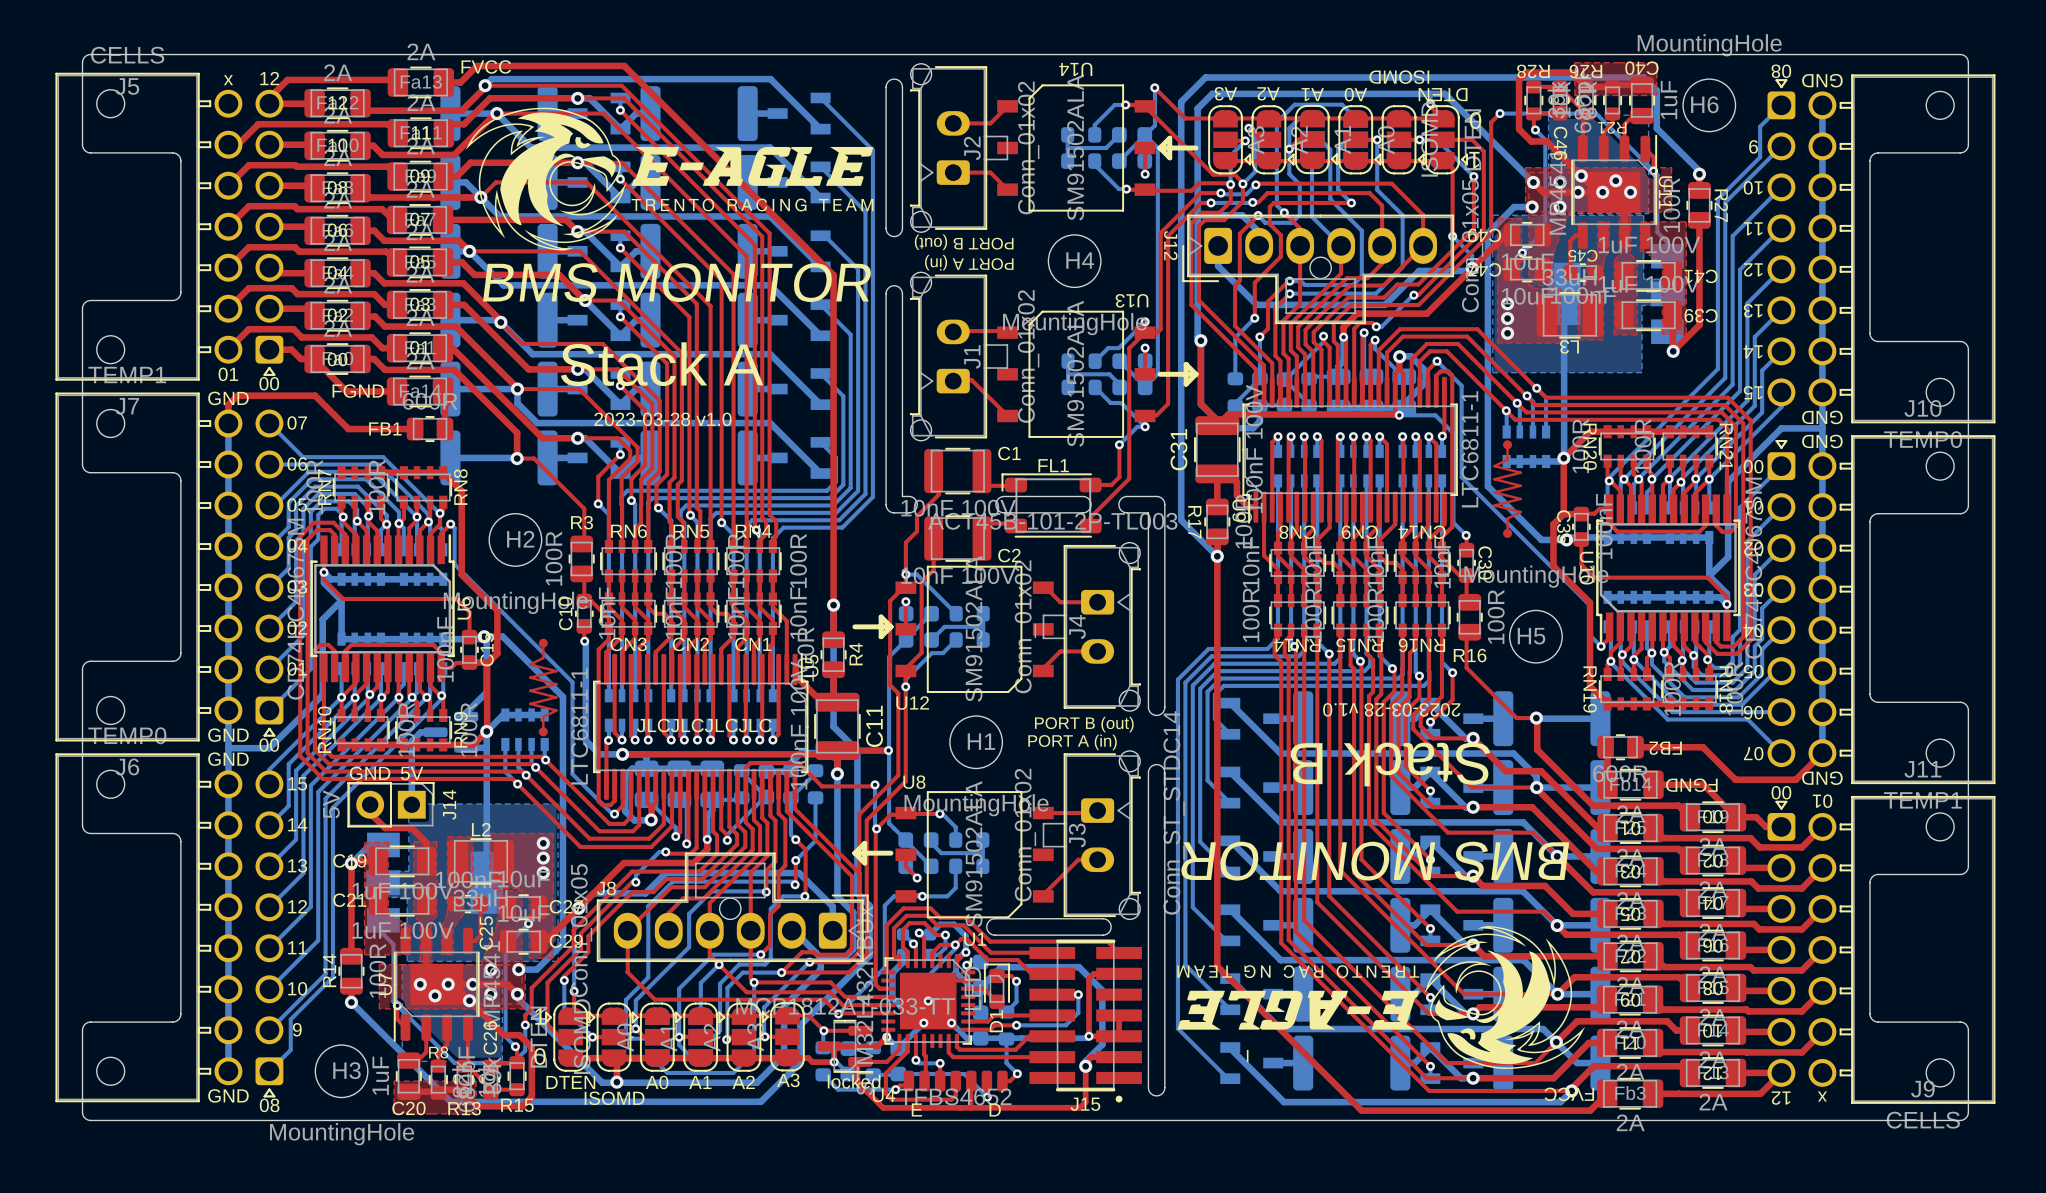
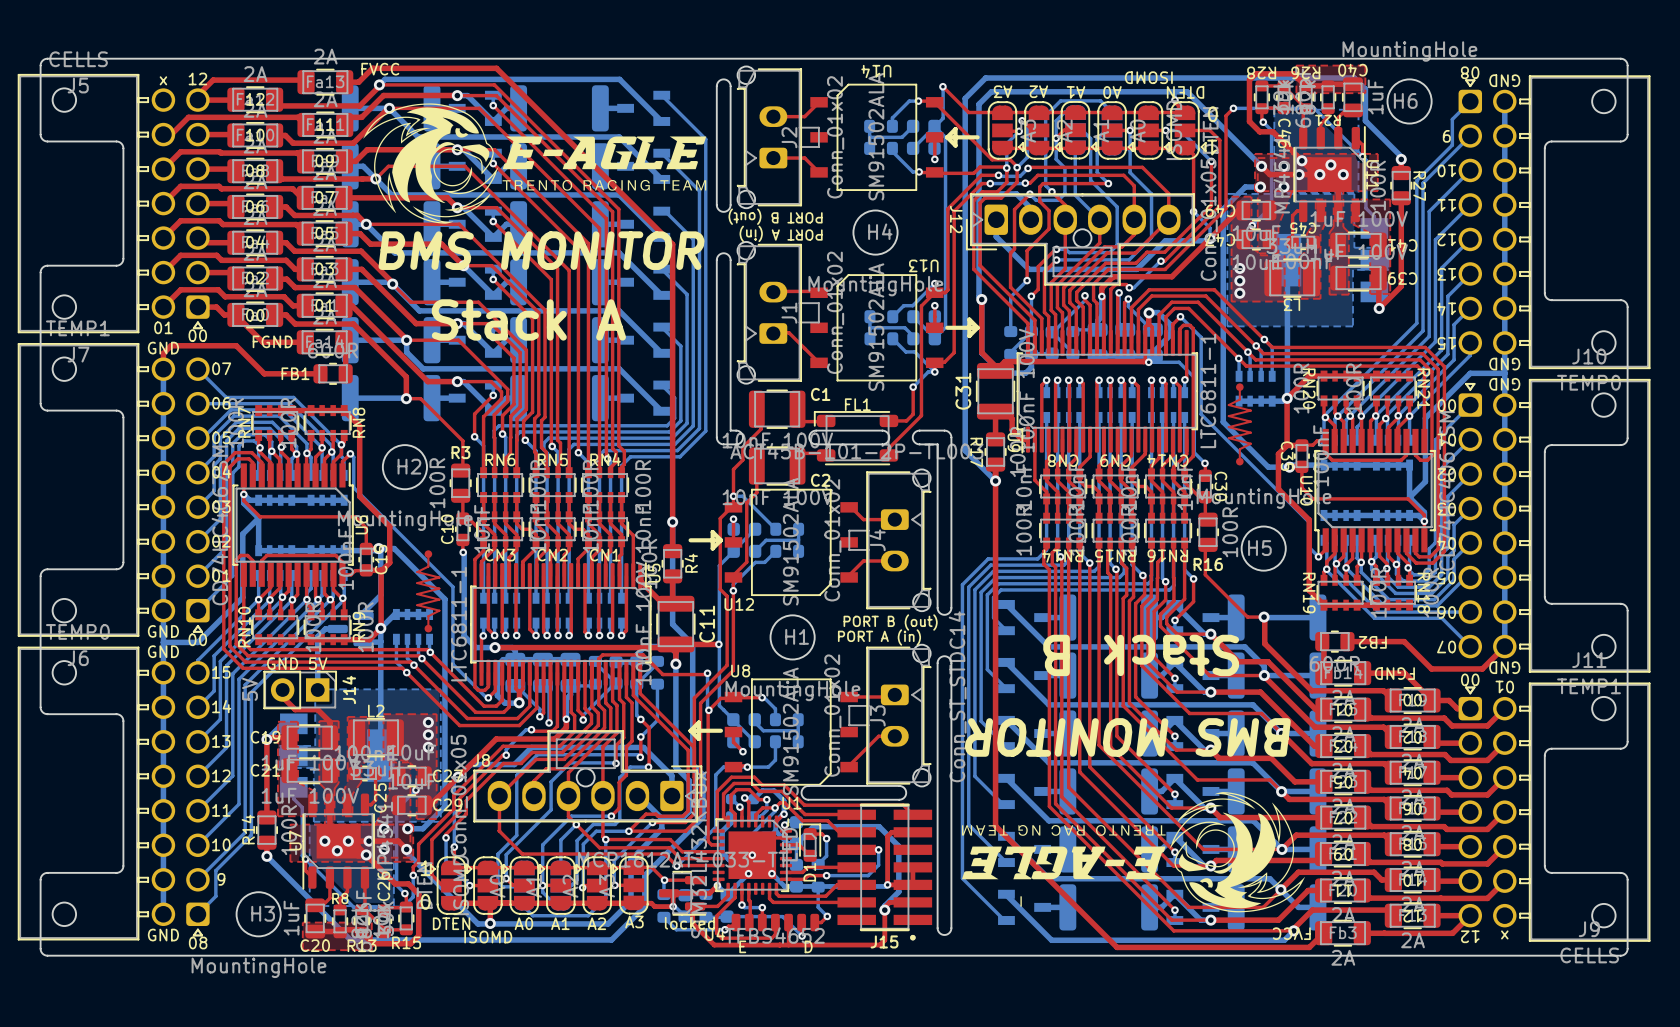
text: 2023-03-28 v1.0 (663, 419) -> none
text: 2023-03-28 v1.0 (1391, 709) -> none
text: JLCJLCJLCJLC (704, 725) -> none

